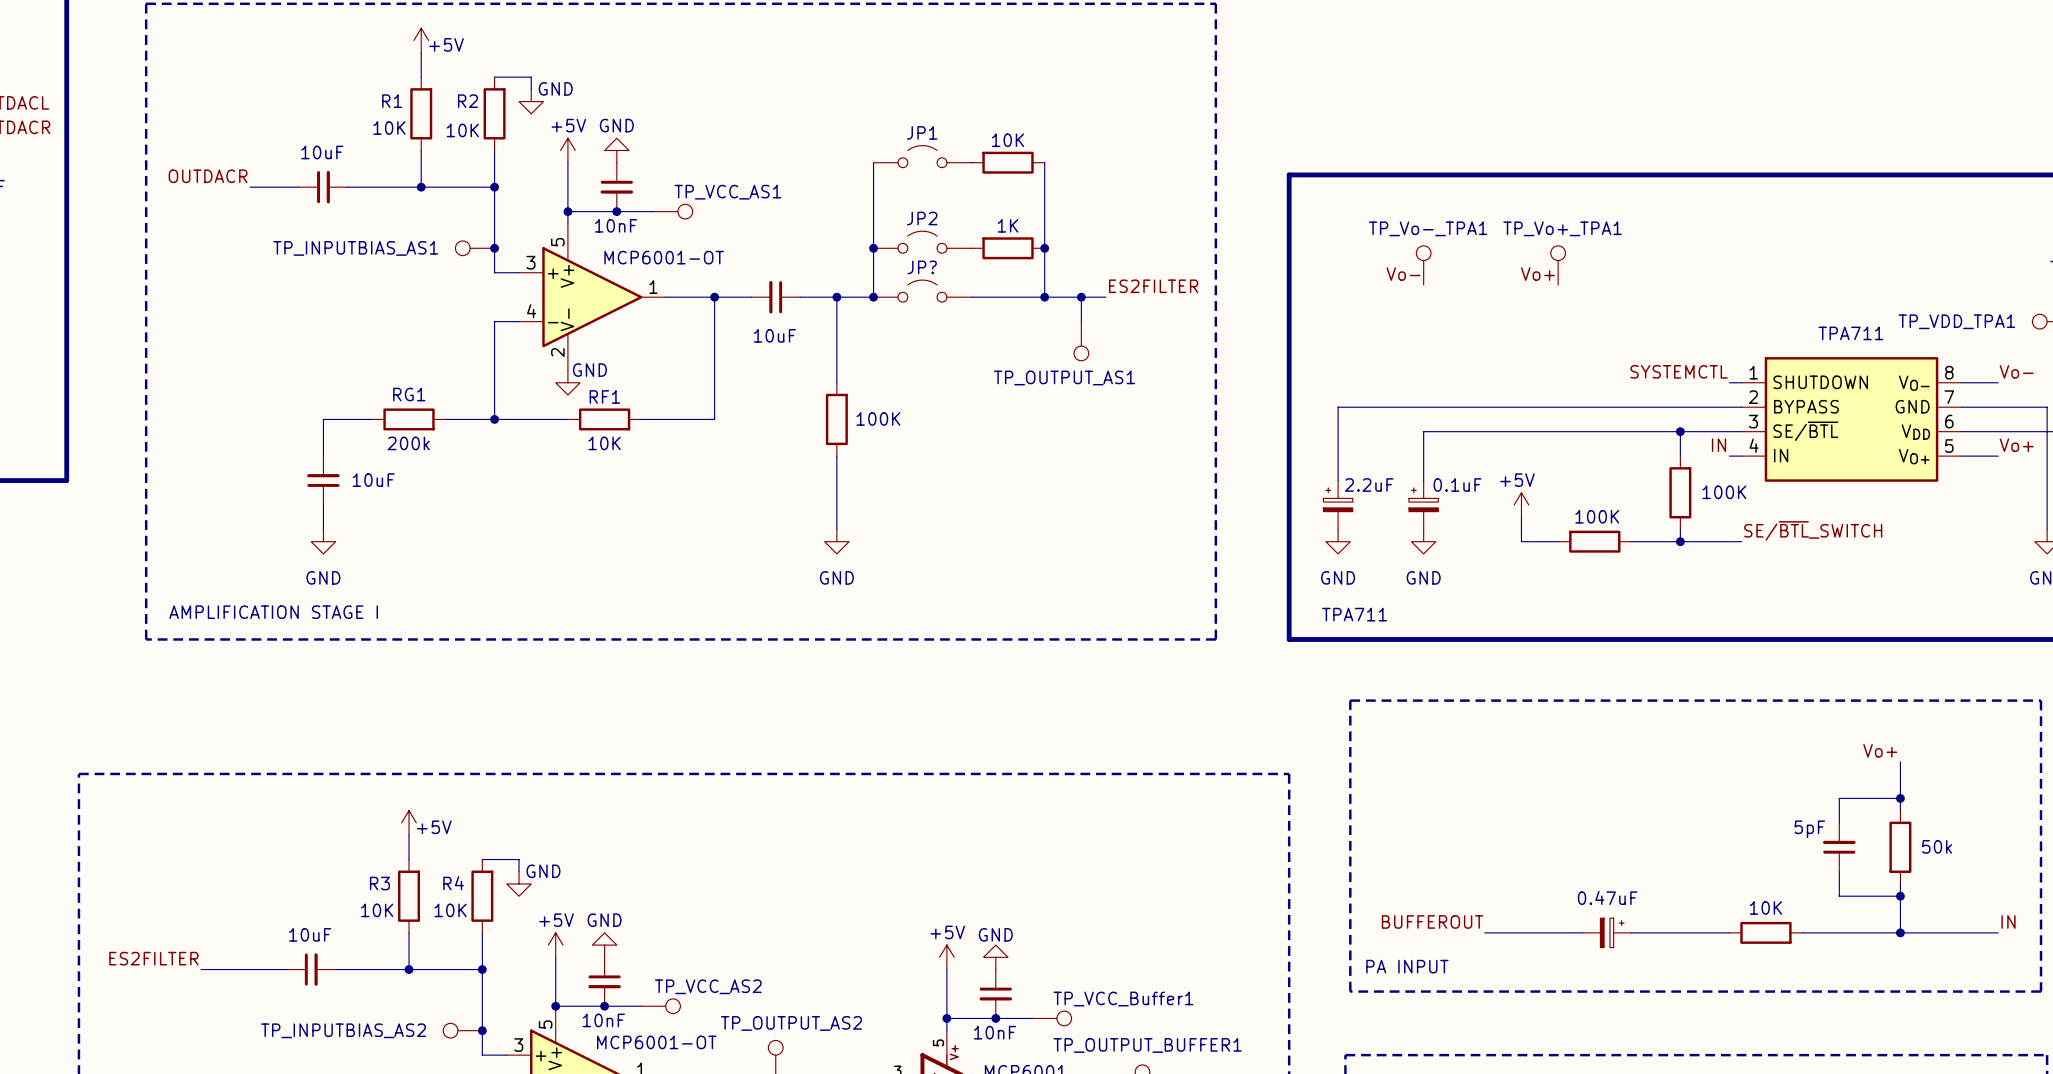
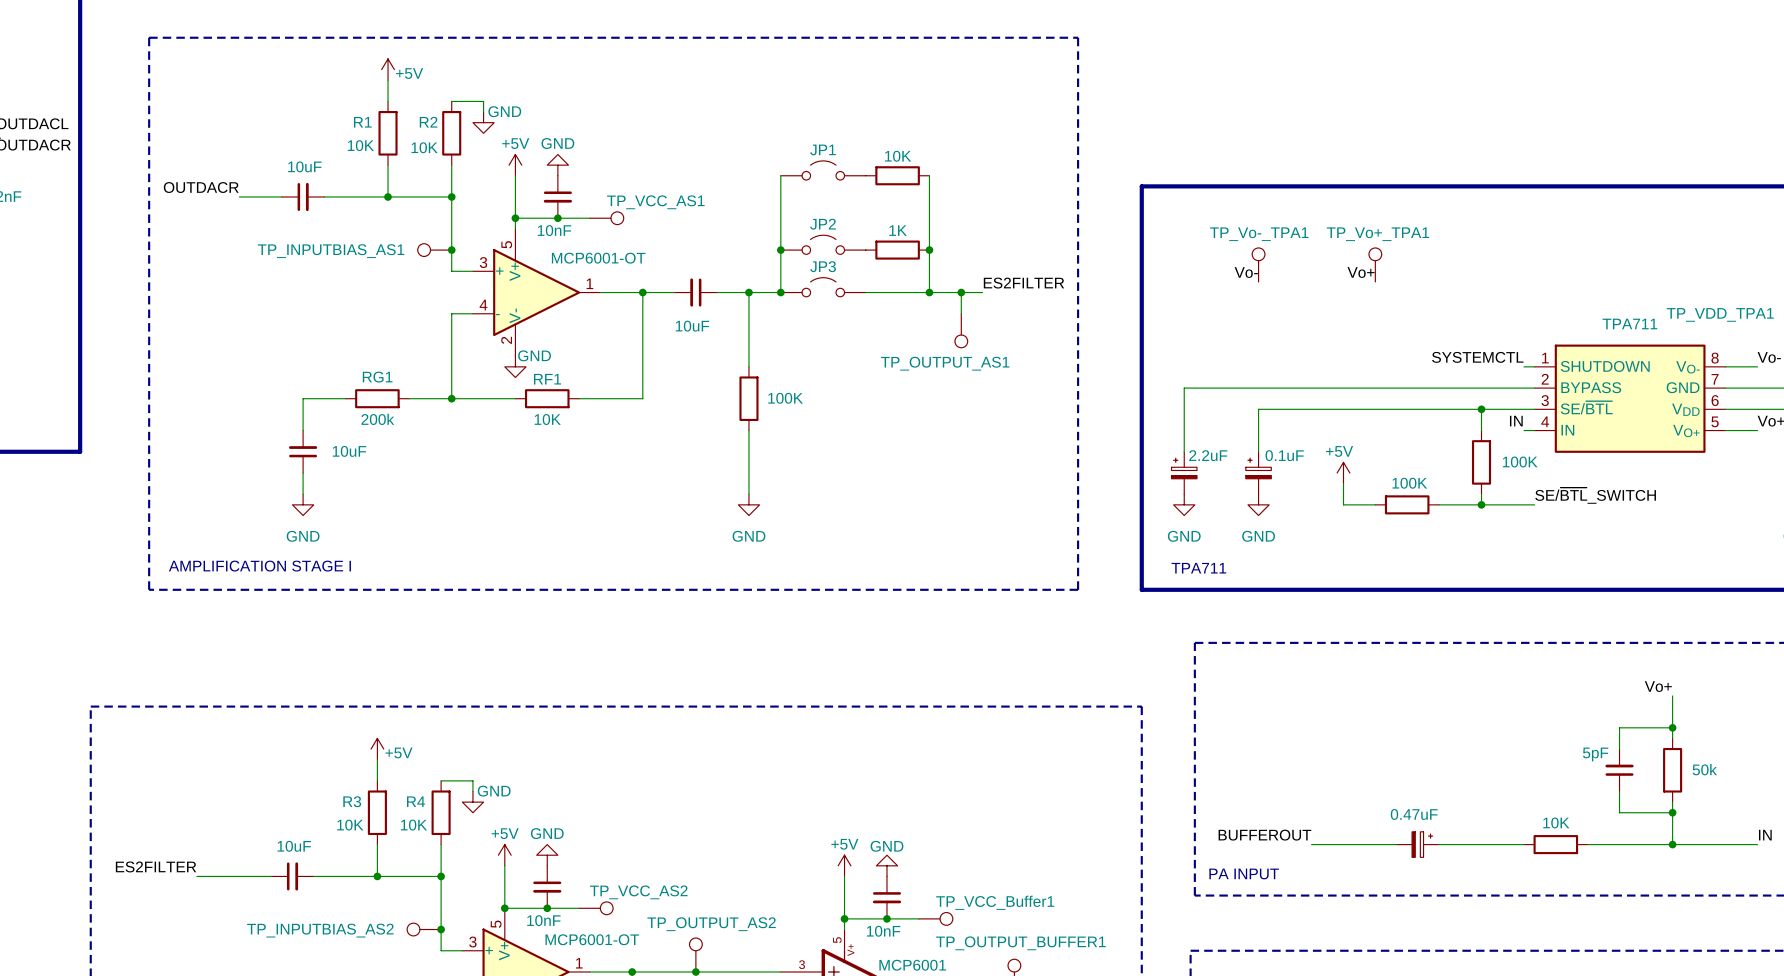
JP? name: JP? (922, 267) -> JP3 (823, 266)

